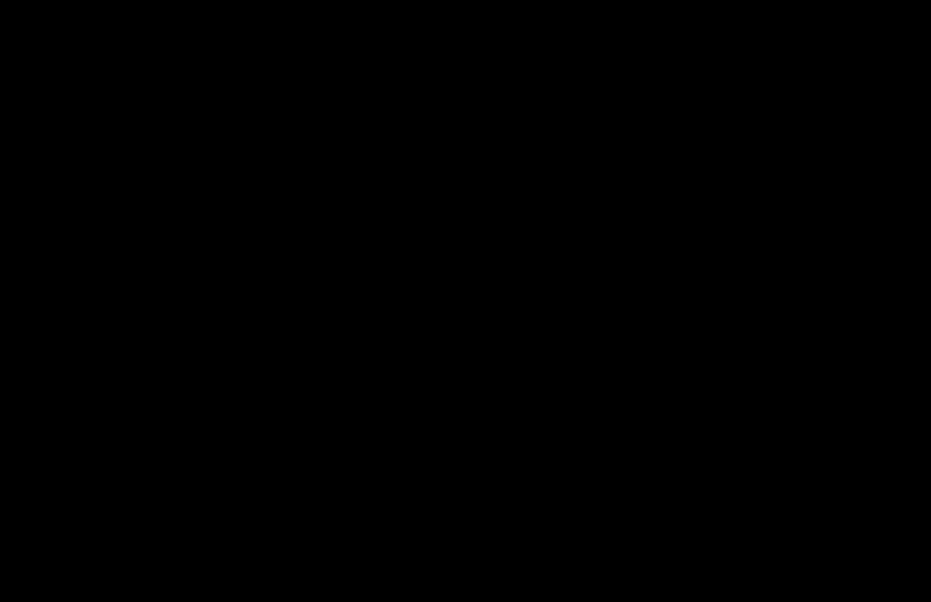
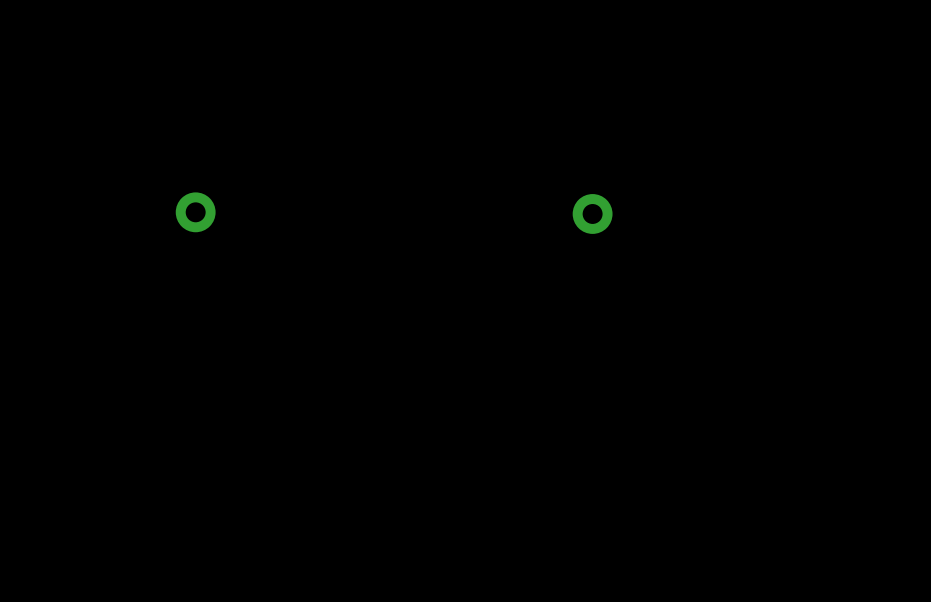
via: none -> (195, 212)
via: none -> (592, 213)

